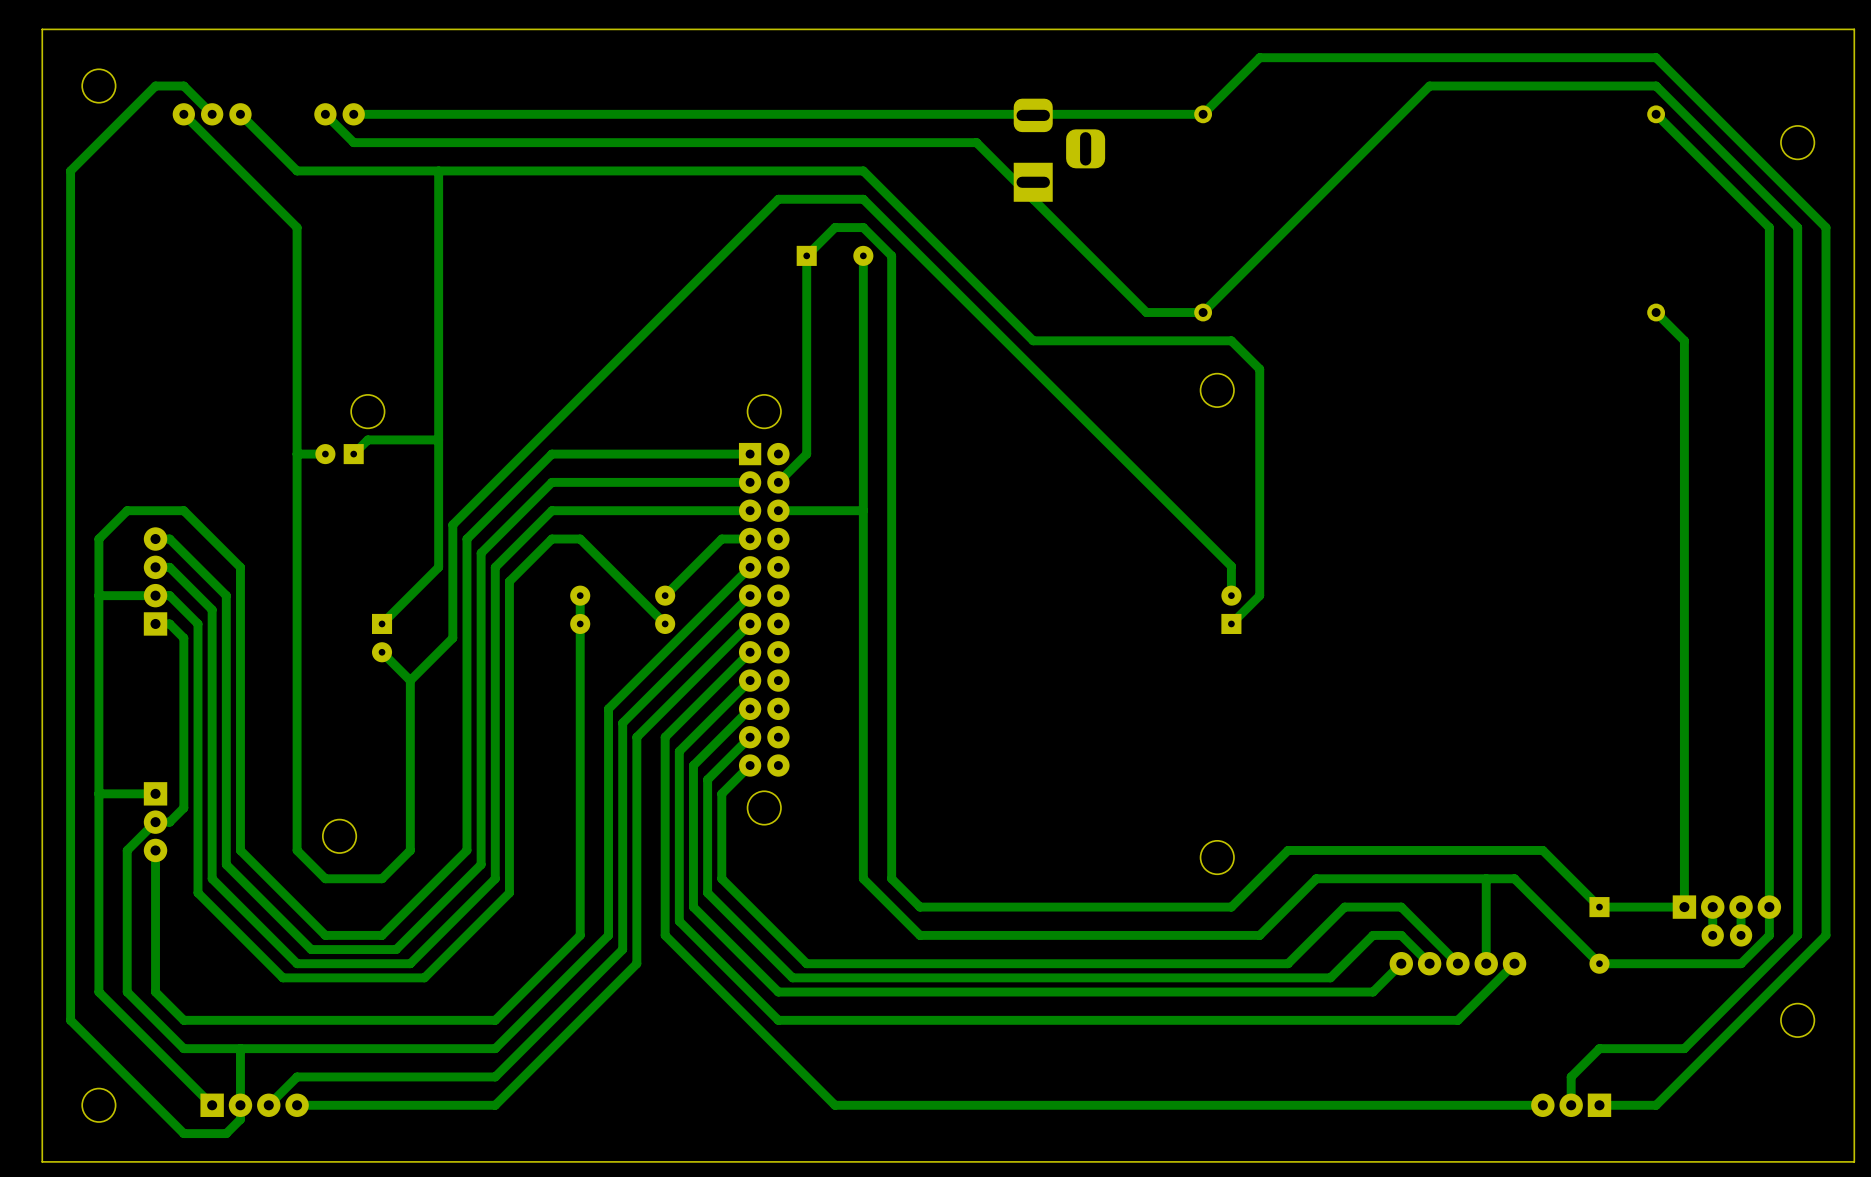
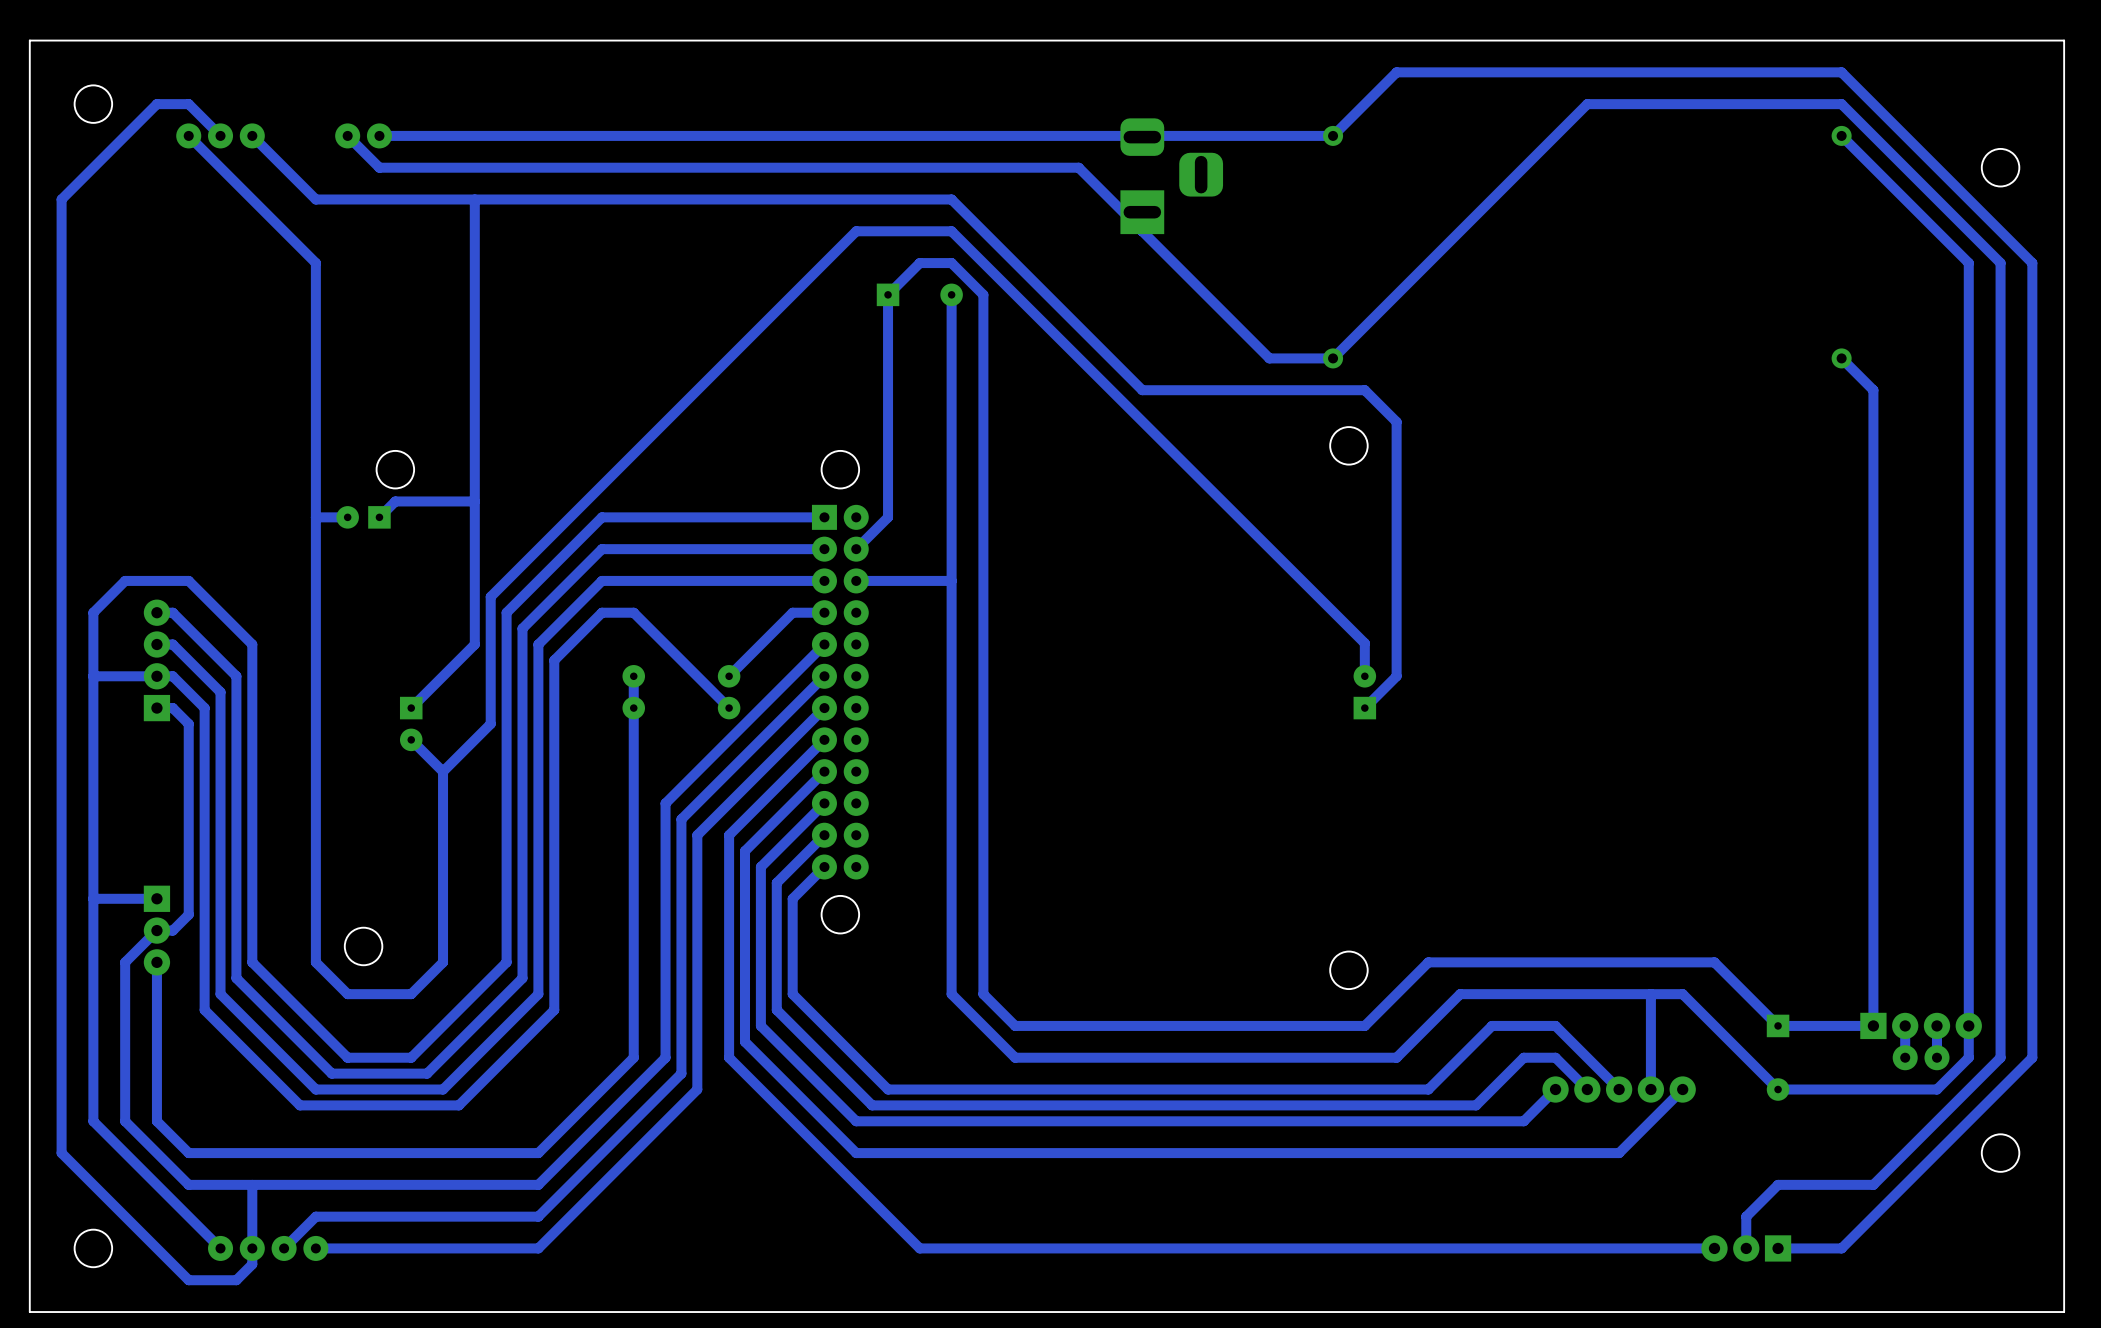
part: none -> (220, 1248)
part: none -> (252, 1248)
part: (254, 1105) -> none
part: none -> (284, 1248)
part: none -> (315, 1248)

